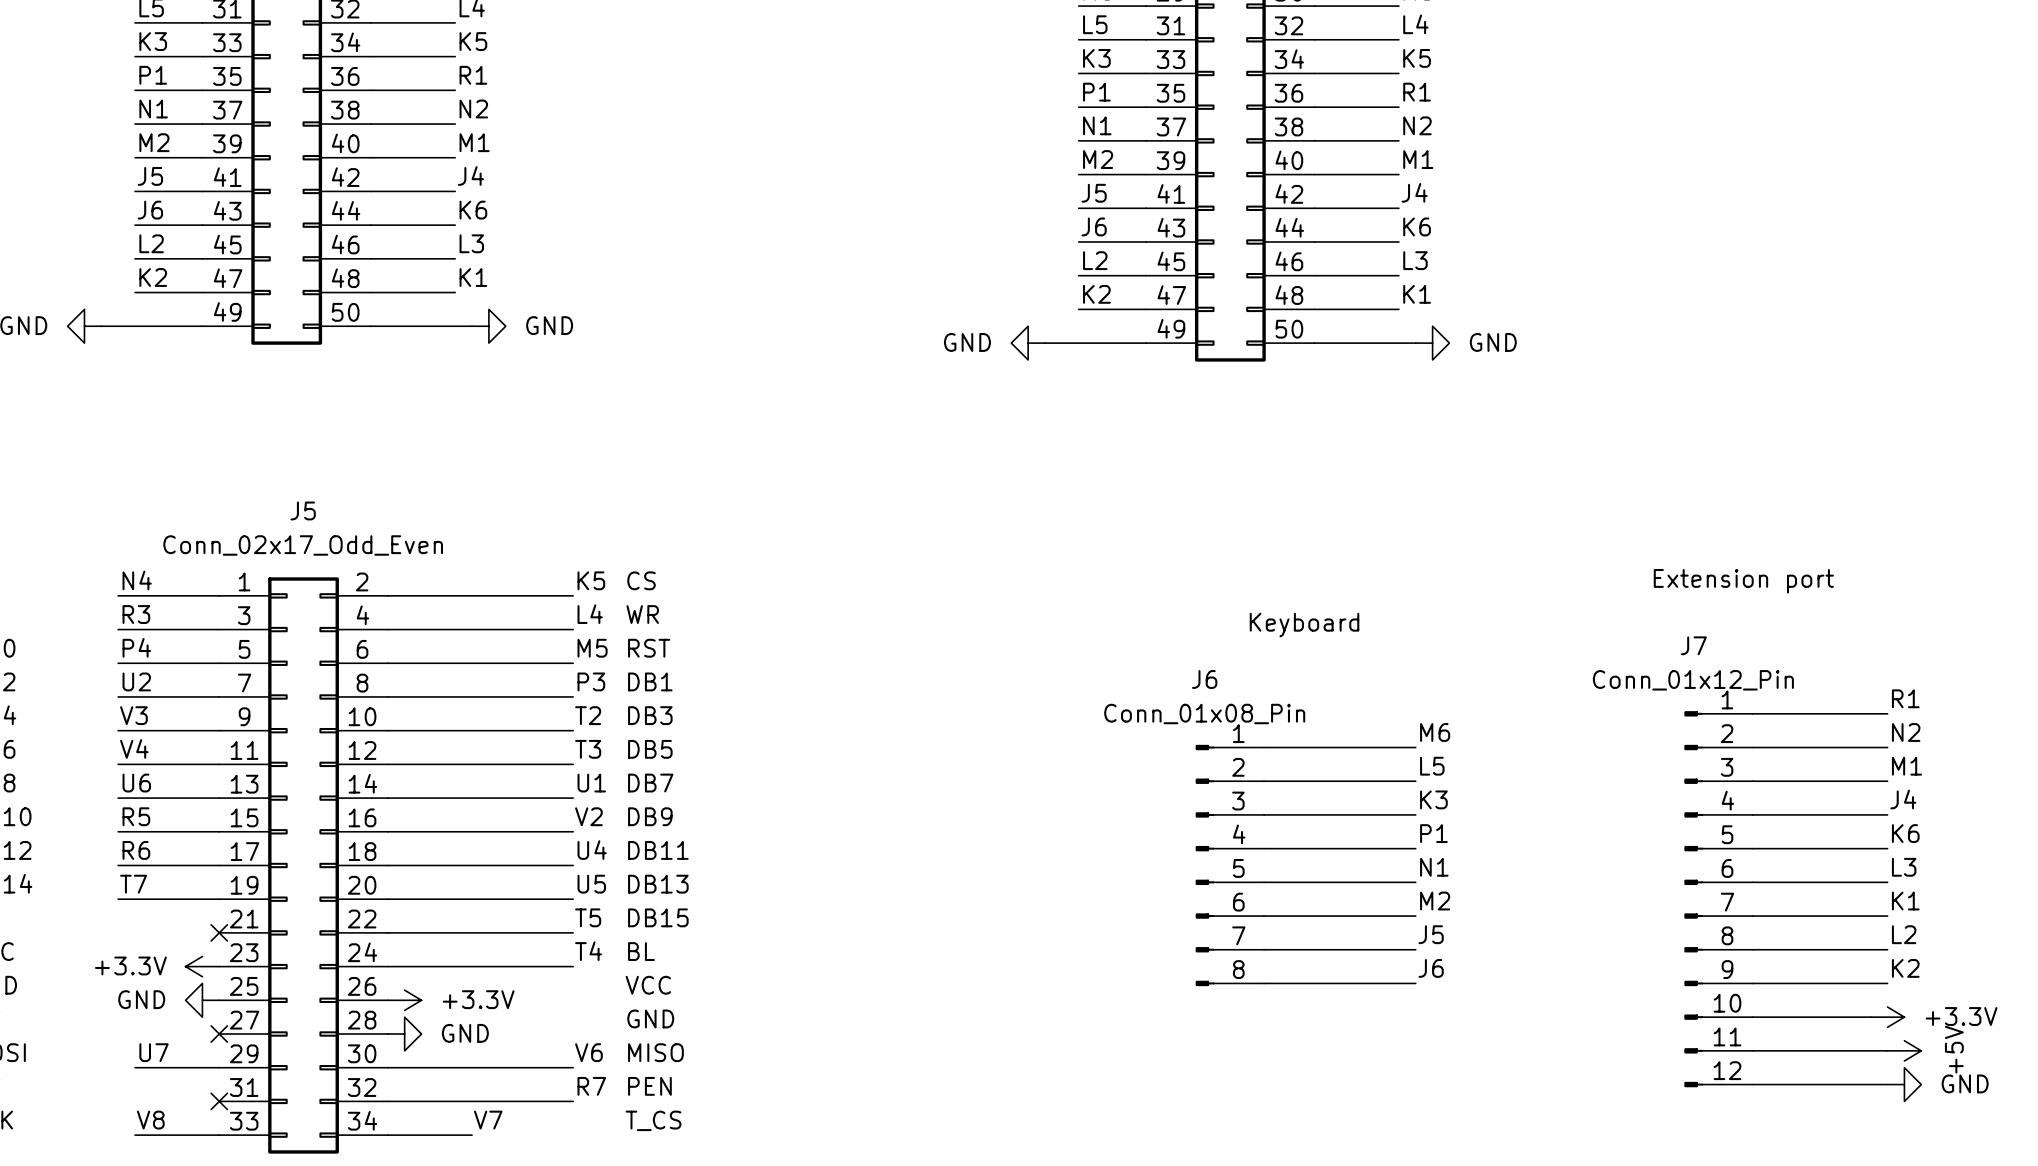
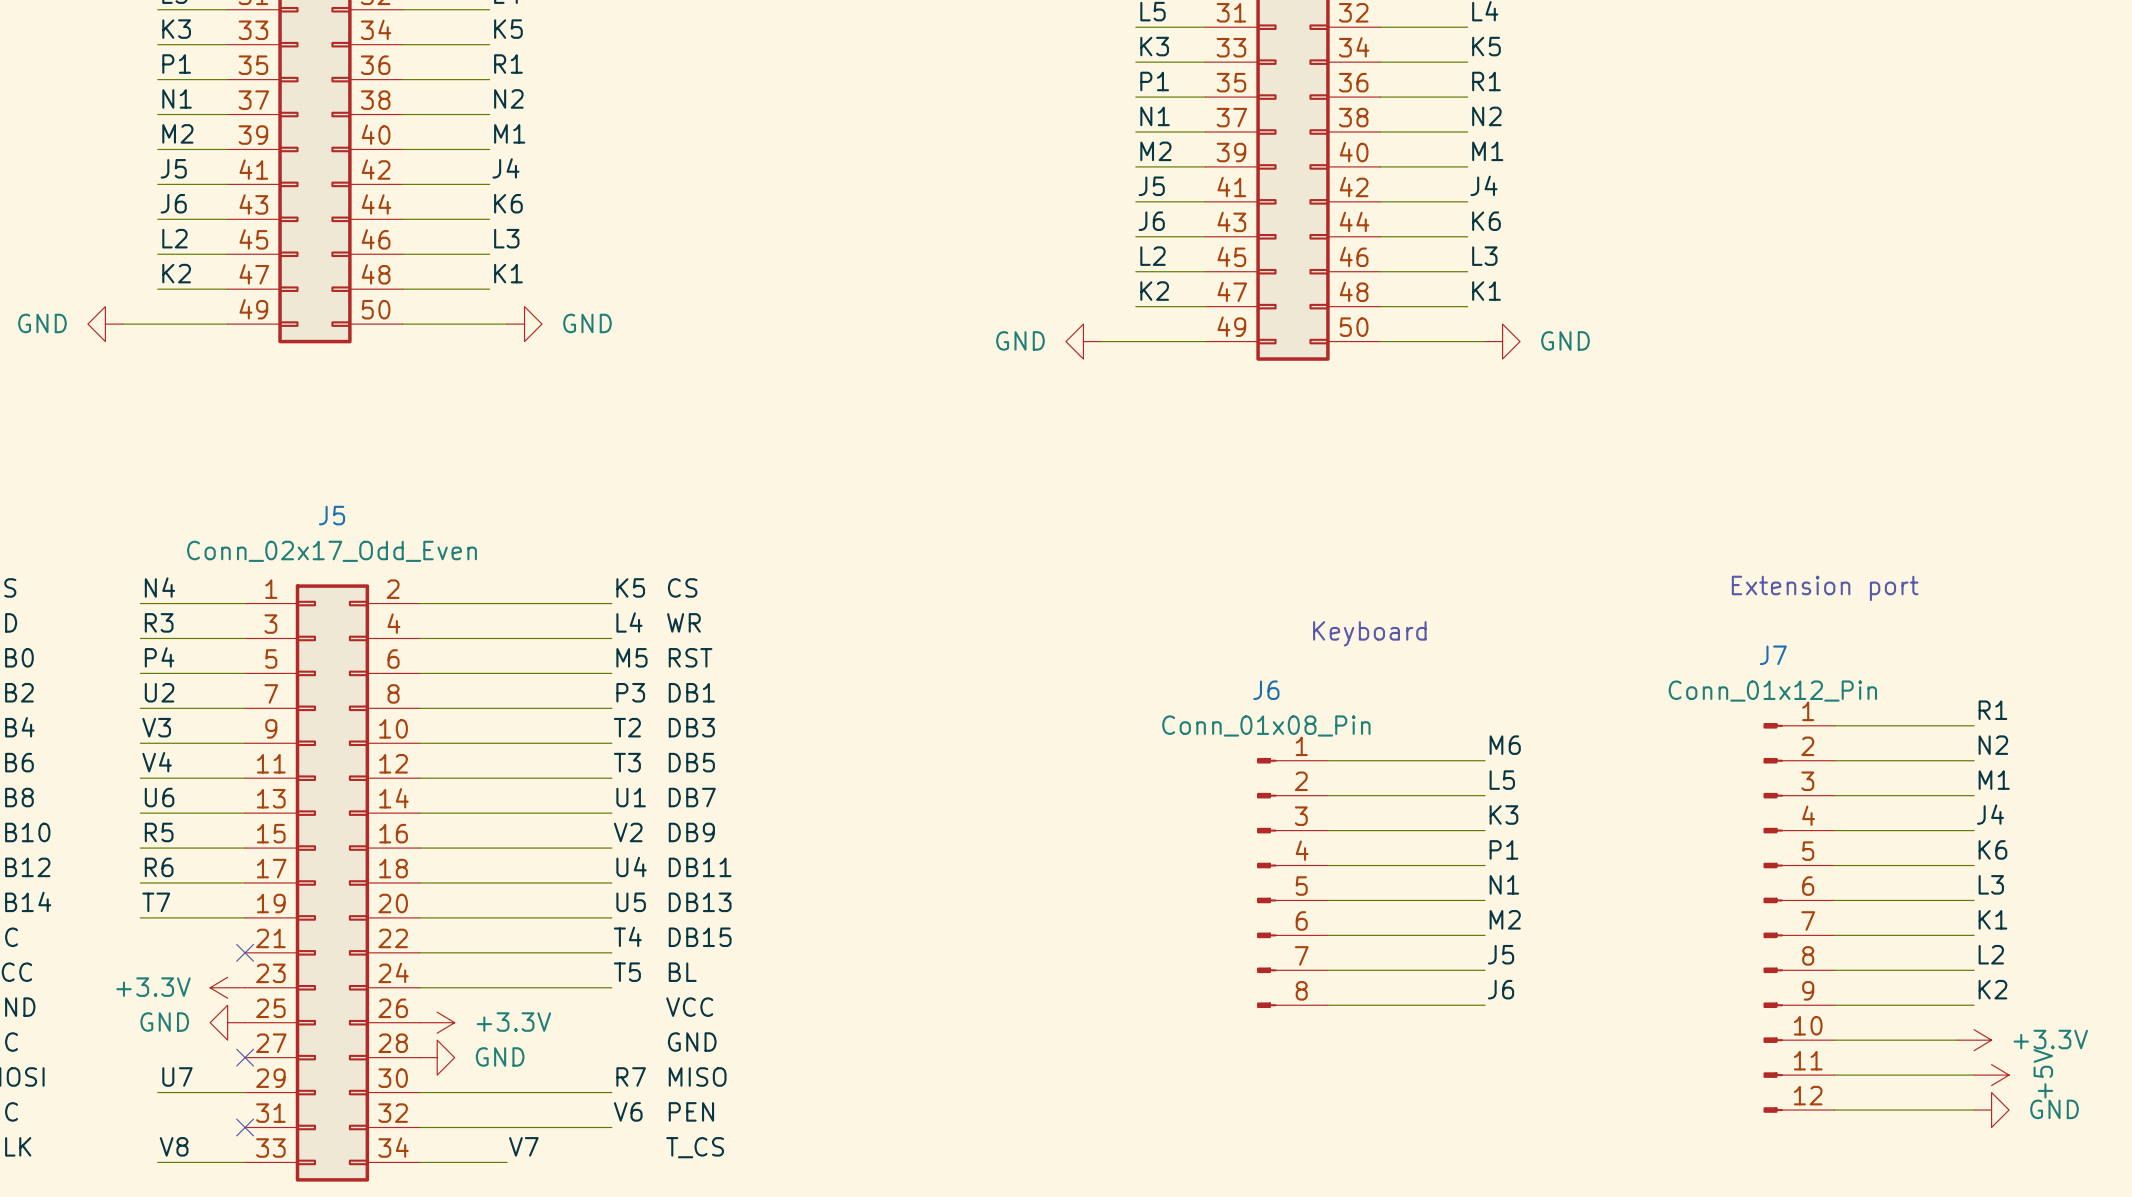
label: T5 (588, 917) -> T4 (627, 936)
label: T4 (588, 951) -> T5 (627, 972)
label: V6 (588, 1052) -> R7 (631, 1076)
label: R7 (591, 1086) -> V6 (628, 1111)

